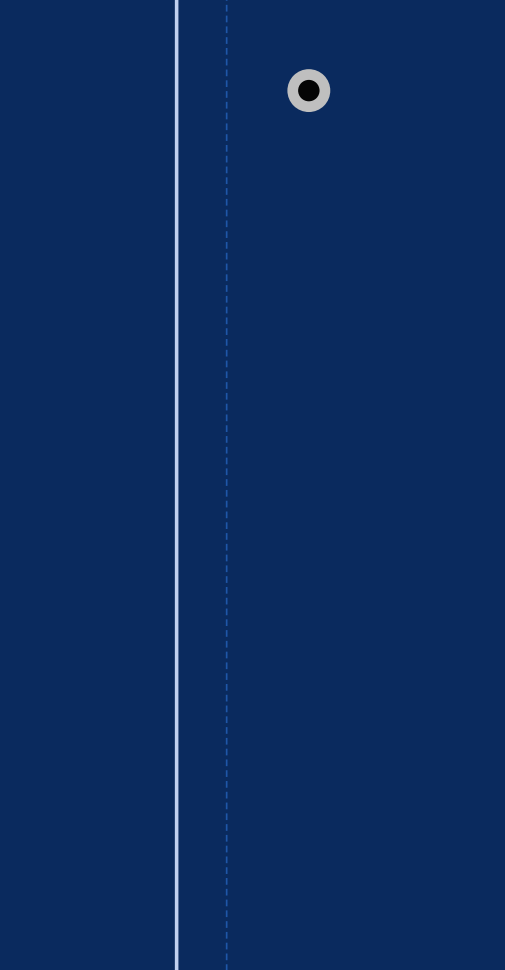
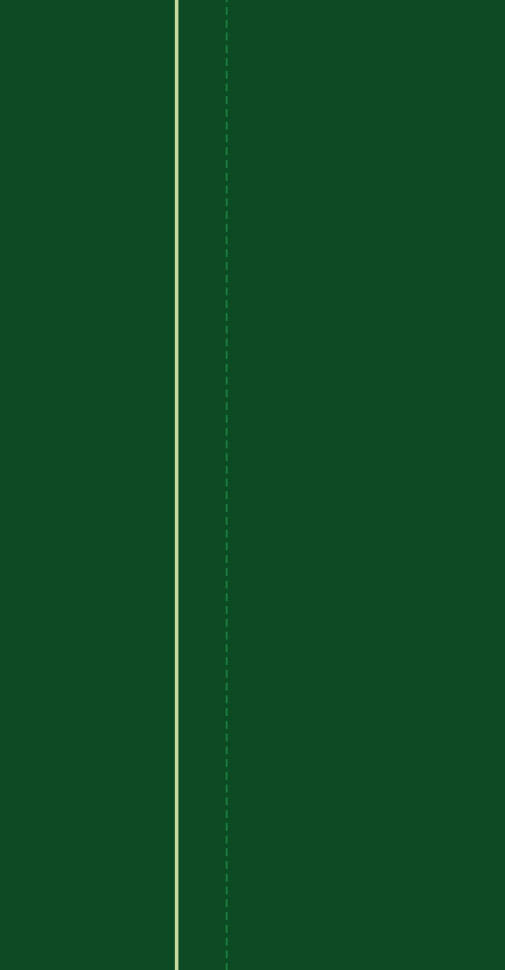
via: (308, 90) -> none

